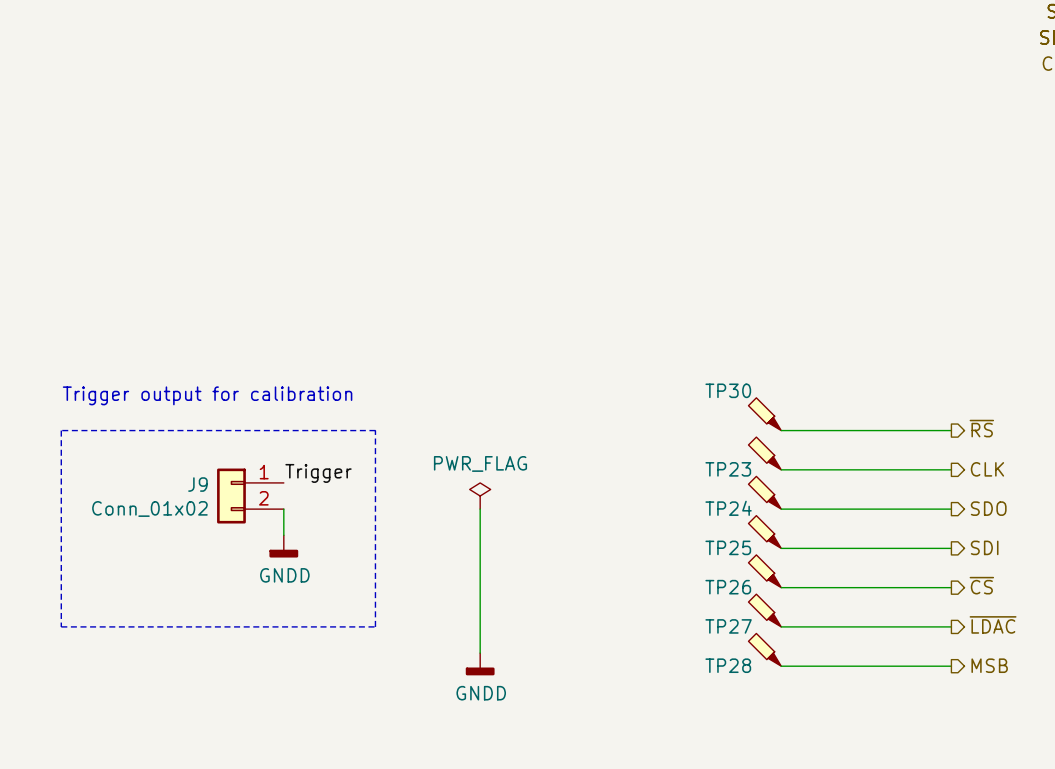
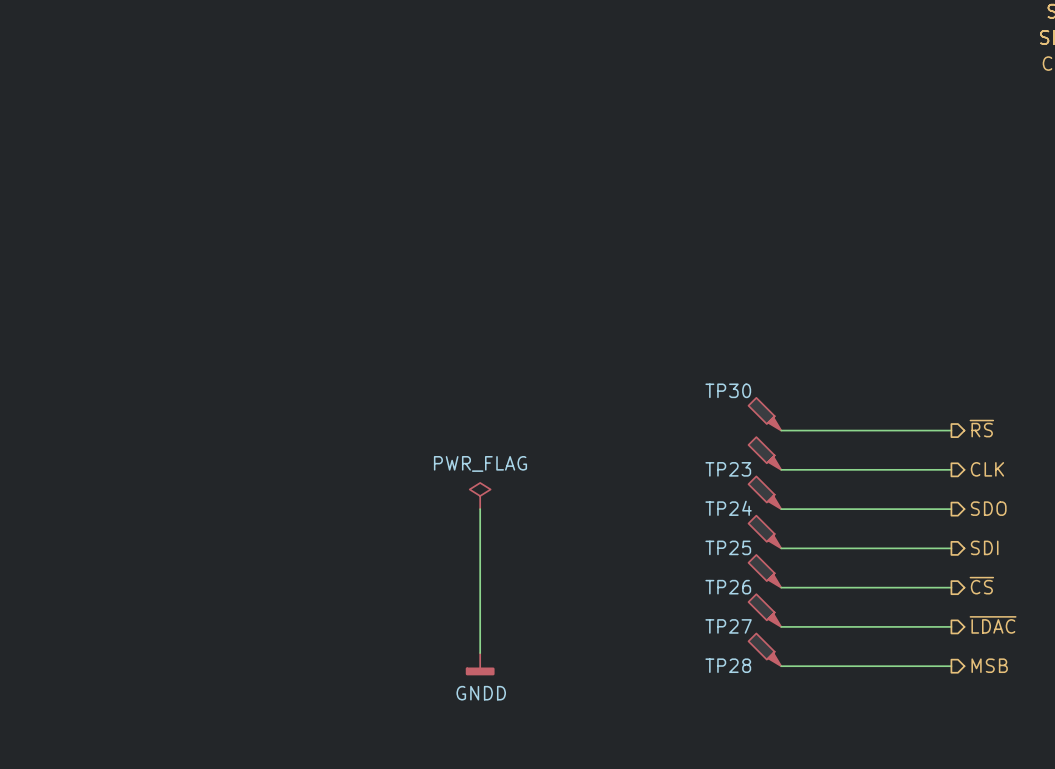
text: Trigger output for calibration (207, 395) -> none
line: (61, 430) (61, 626) (375, 626) (375, 430) (61, 430) -> none
label: Trigger (318, 473) -> none
J9: Conn_01x02 (250, 496) -> none
wire: (283, 509) (283, 535) -> none
power symbol: GNDD (283, 546) -> none

